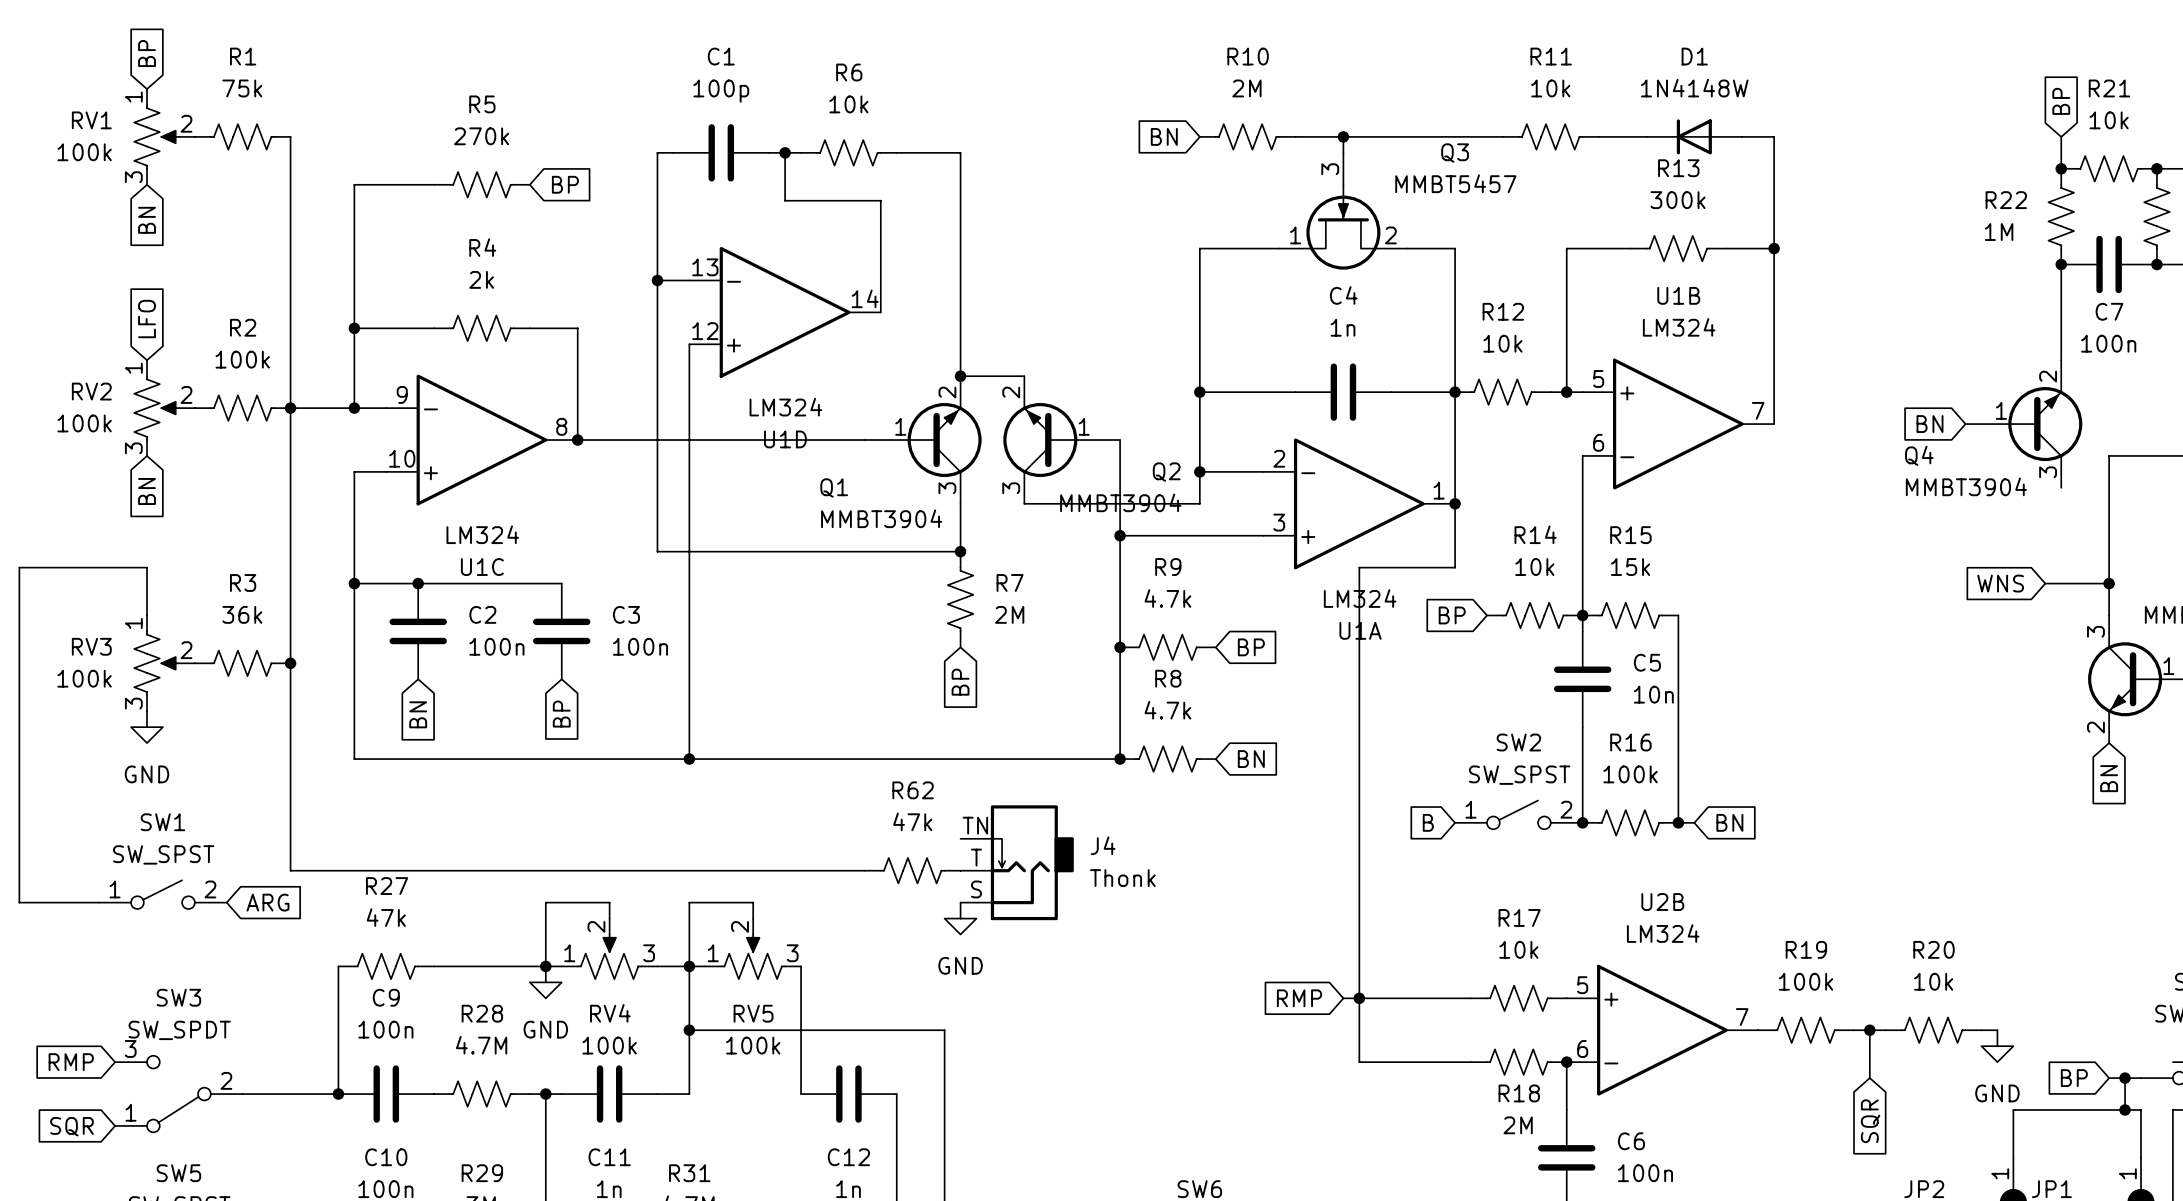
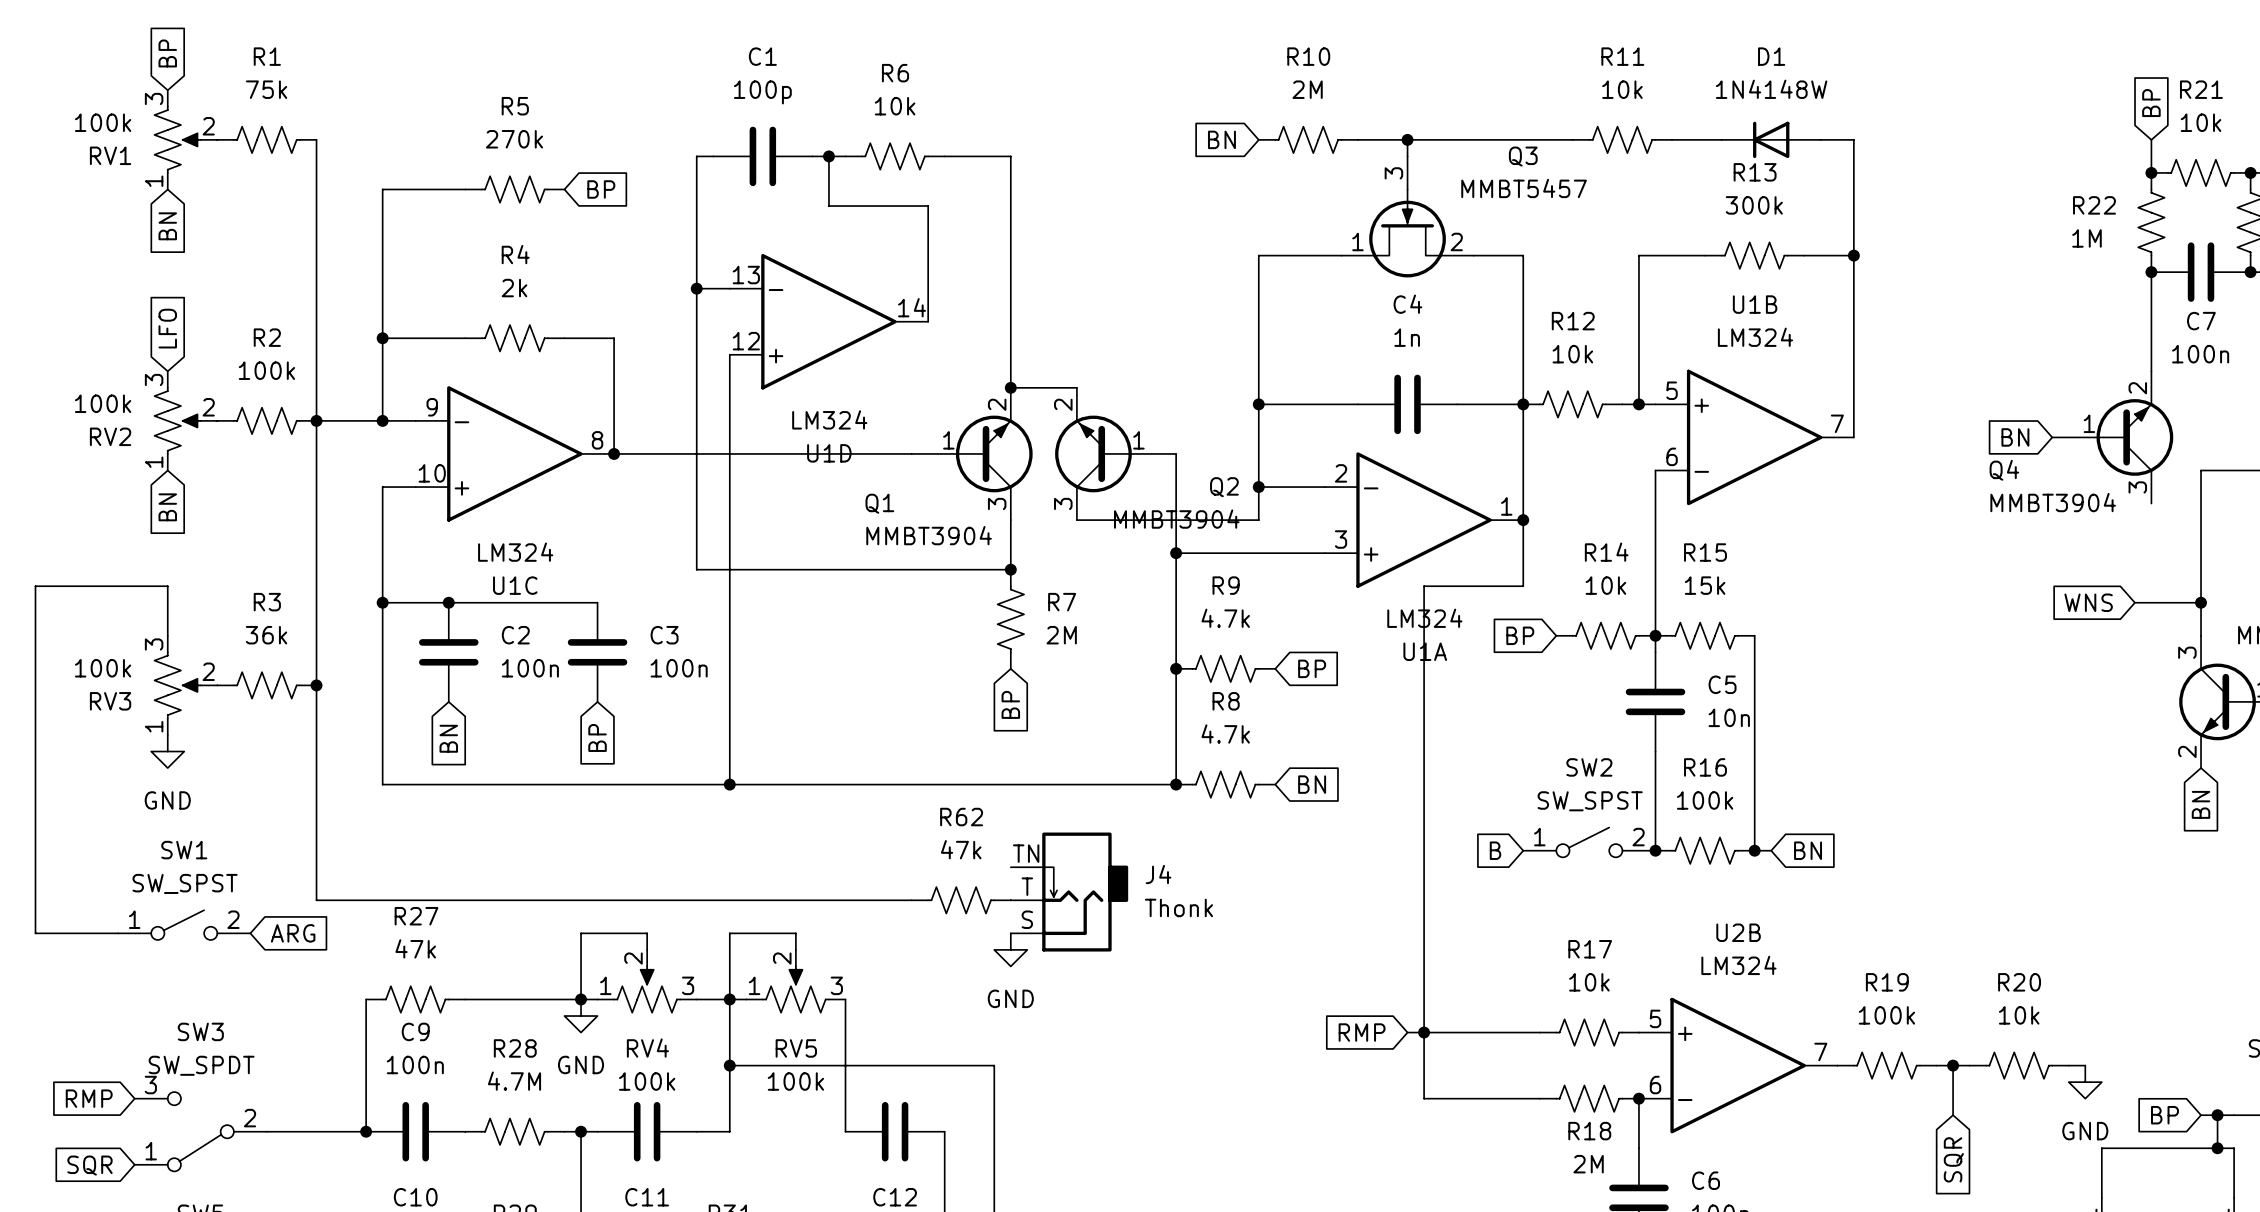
RV1 flip: as is (156, 136) -> up-down (177, 139)
RV2 flip: as is (156, 408) -> up-down (177, 420)
RV3 flip: as is (156, 663) -> up-down (177, 685)

